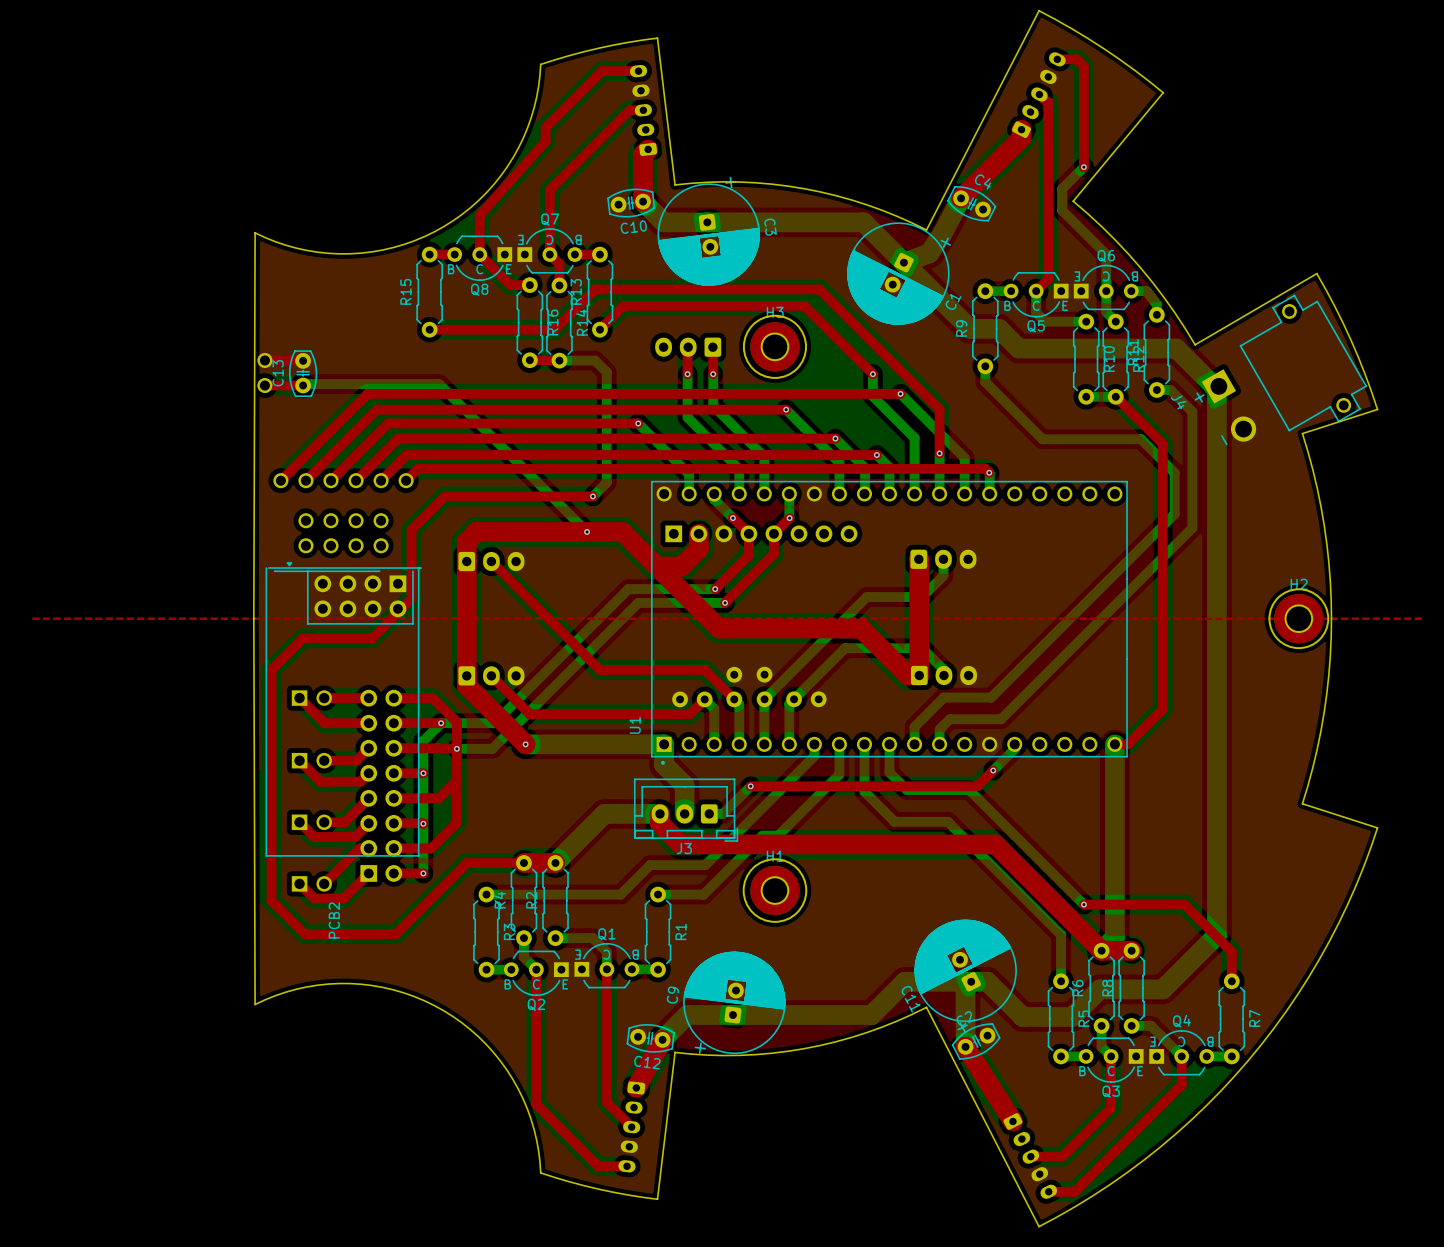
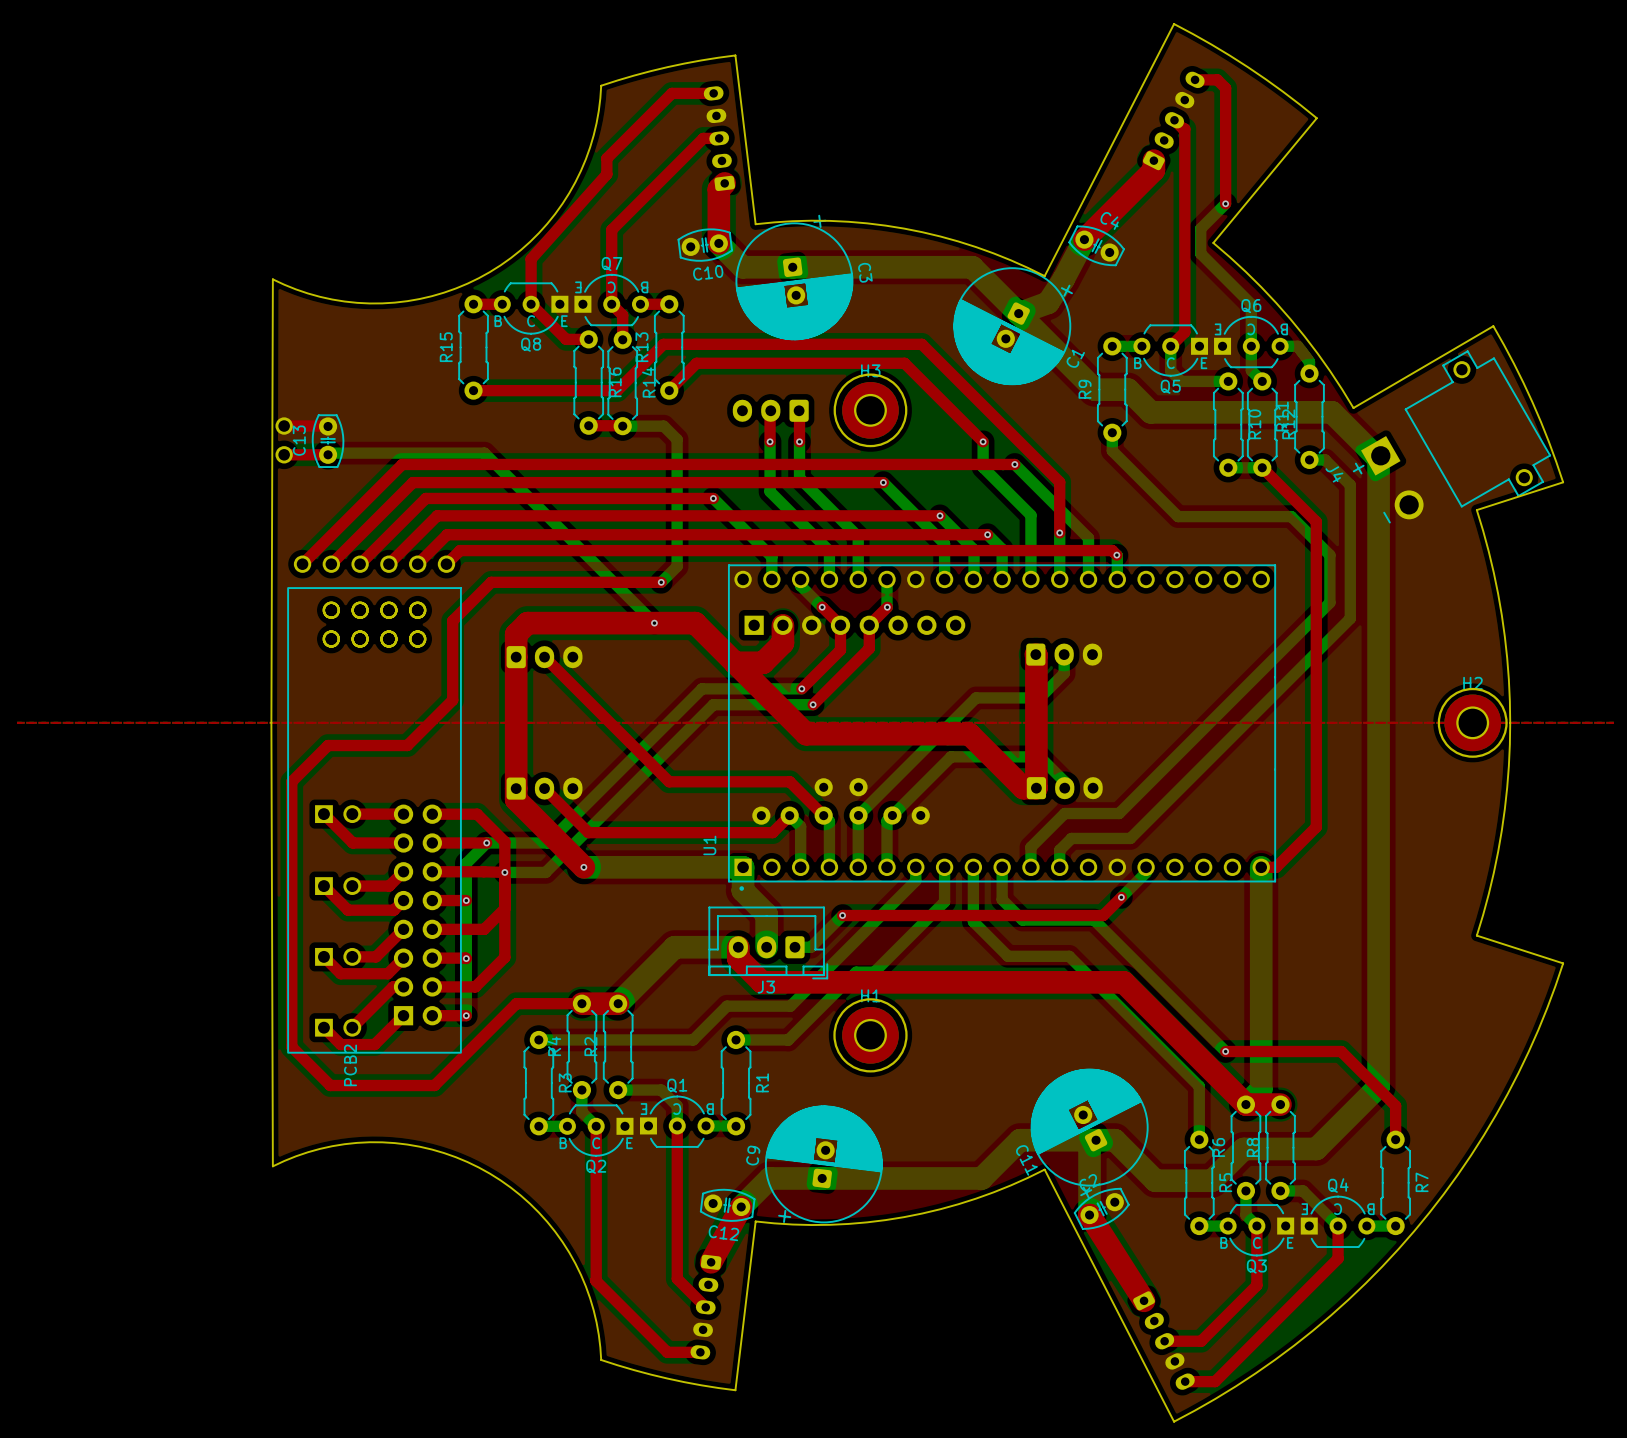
PCB2 footprint: [265, 562, 422, 857] -> [287, 587, 462, 1054]

